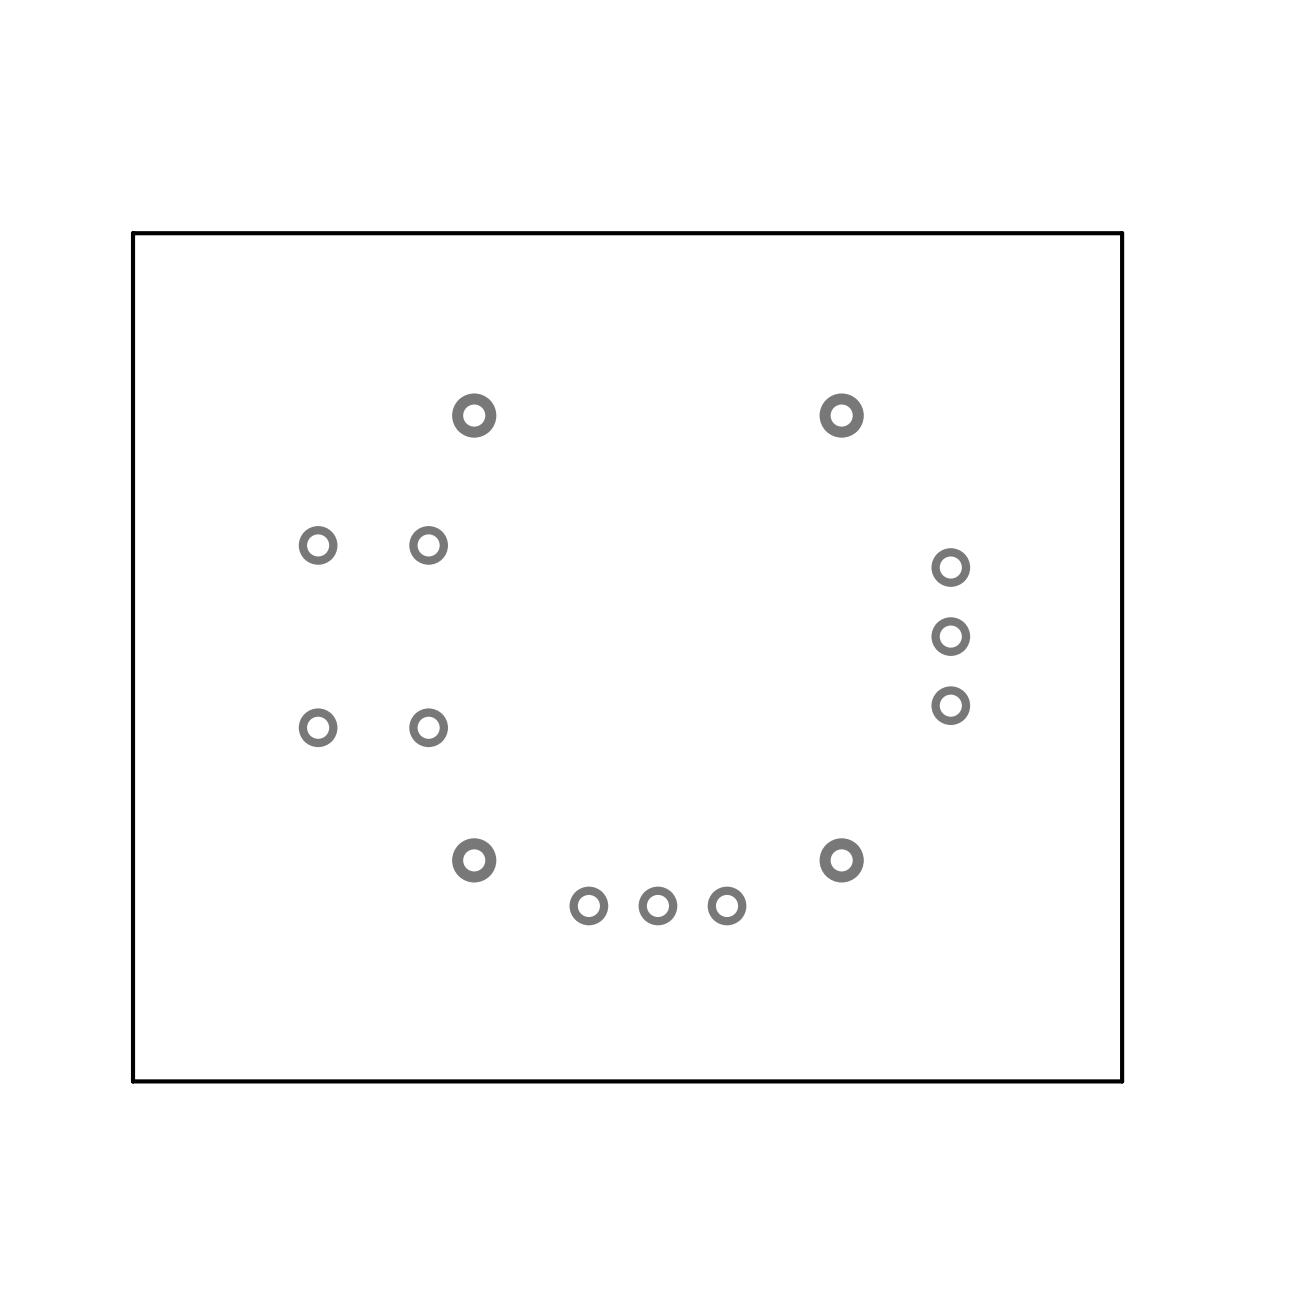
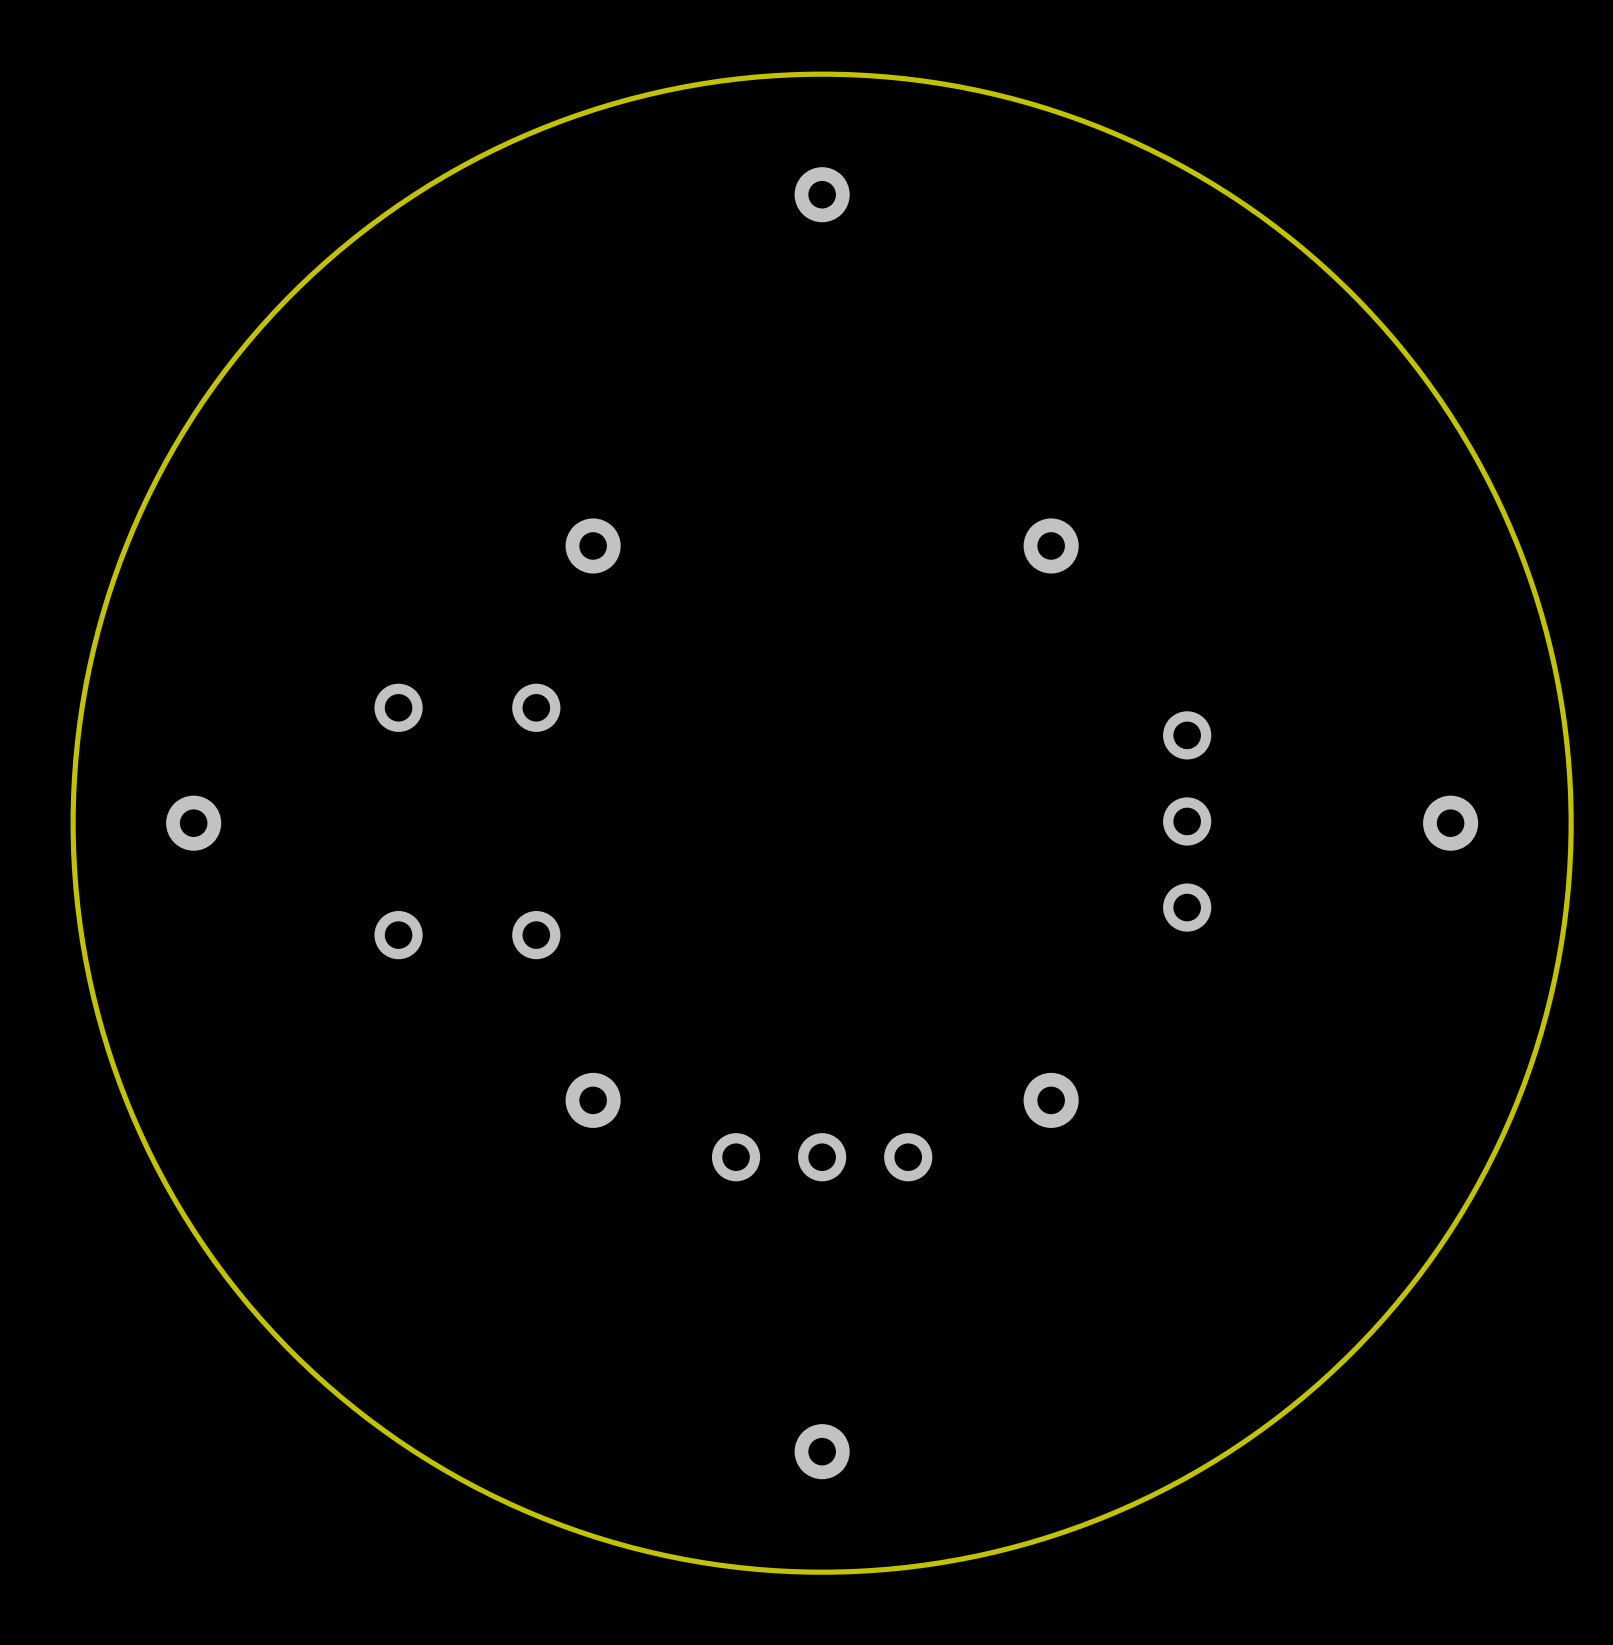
round board edge: none -> [70, 71, 1574, 1575]
via: none -> (822, 194)
board edge: (133, 233) (1122, 233) (1122, 1081) (133, 1081) (133, 233) -> none
via: none -> (193, 823)
via: none -> (1450, 823)
via: none -> (822, 1451)

